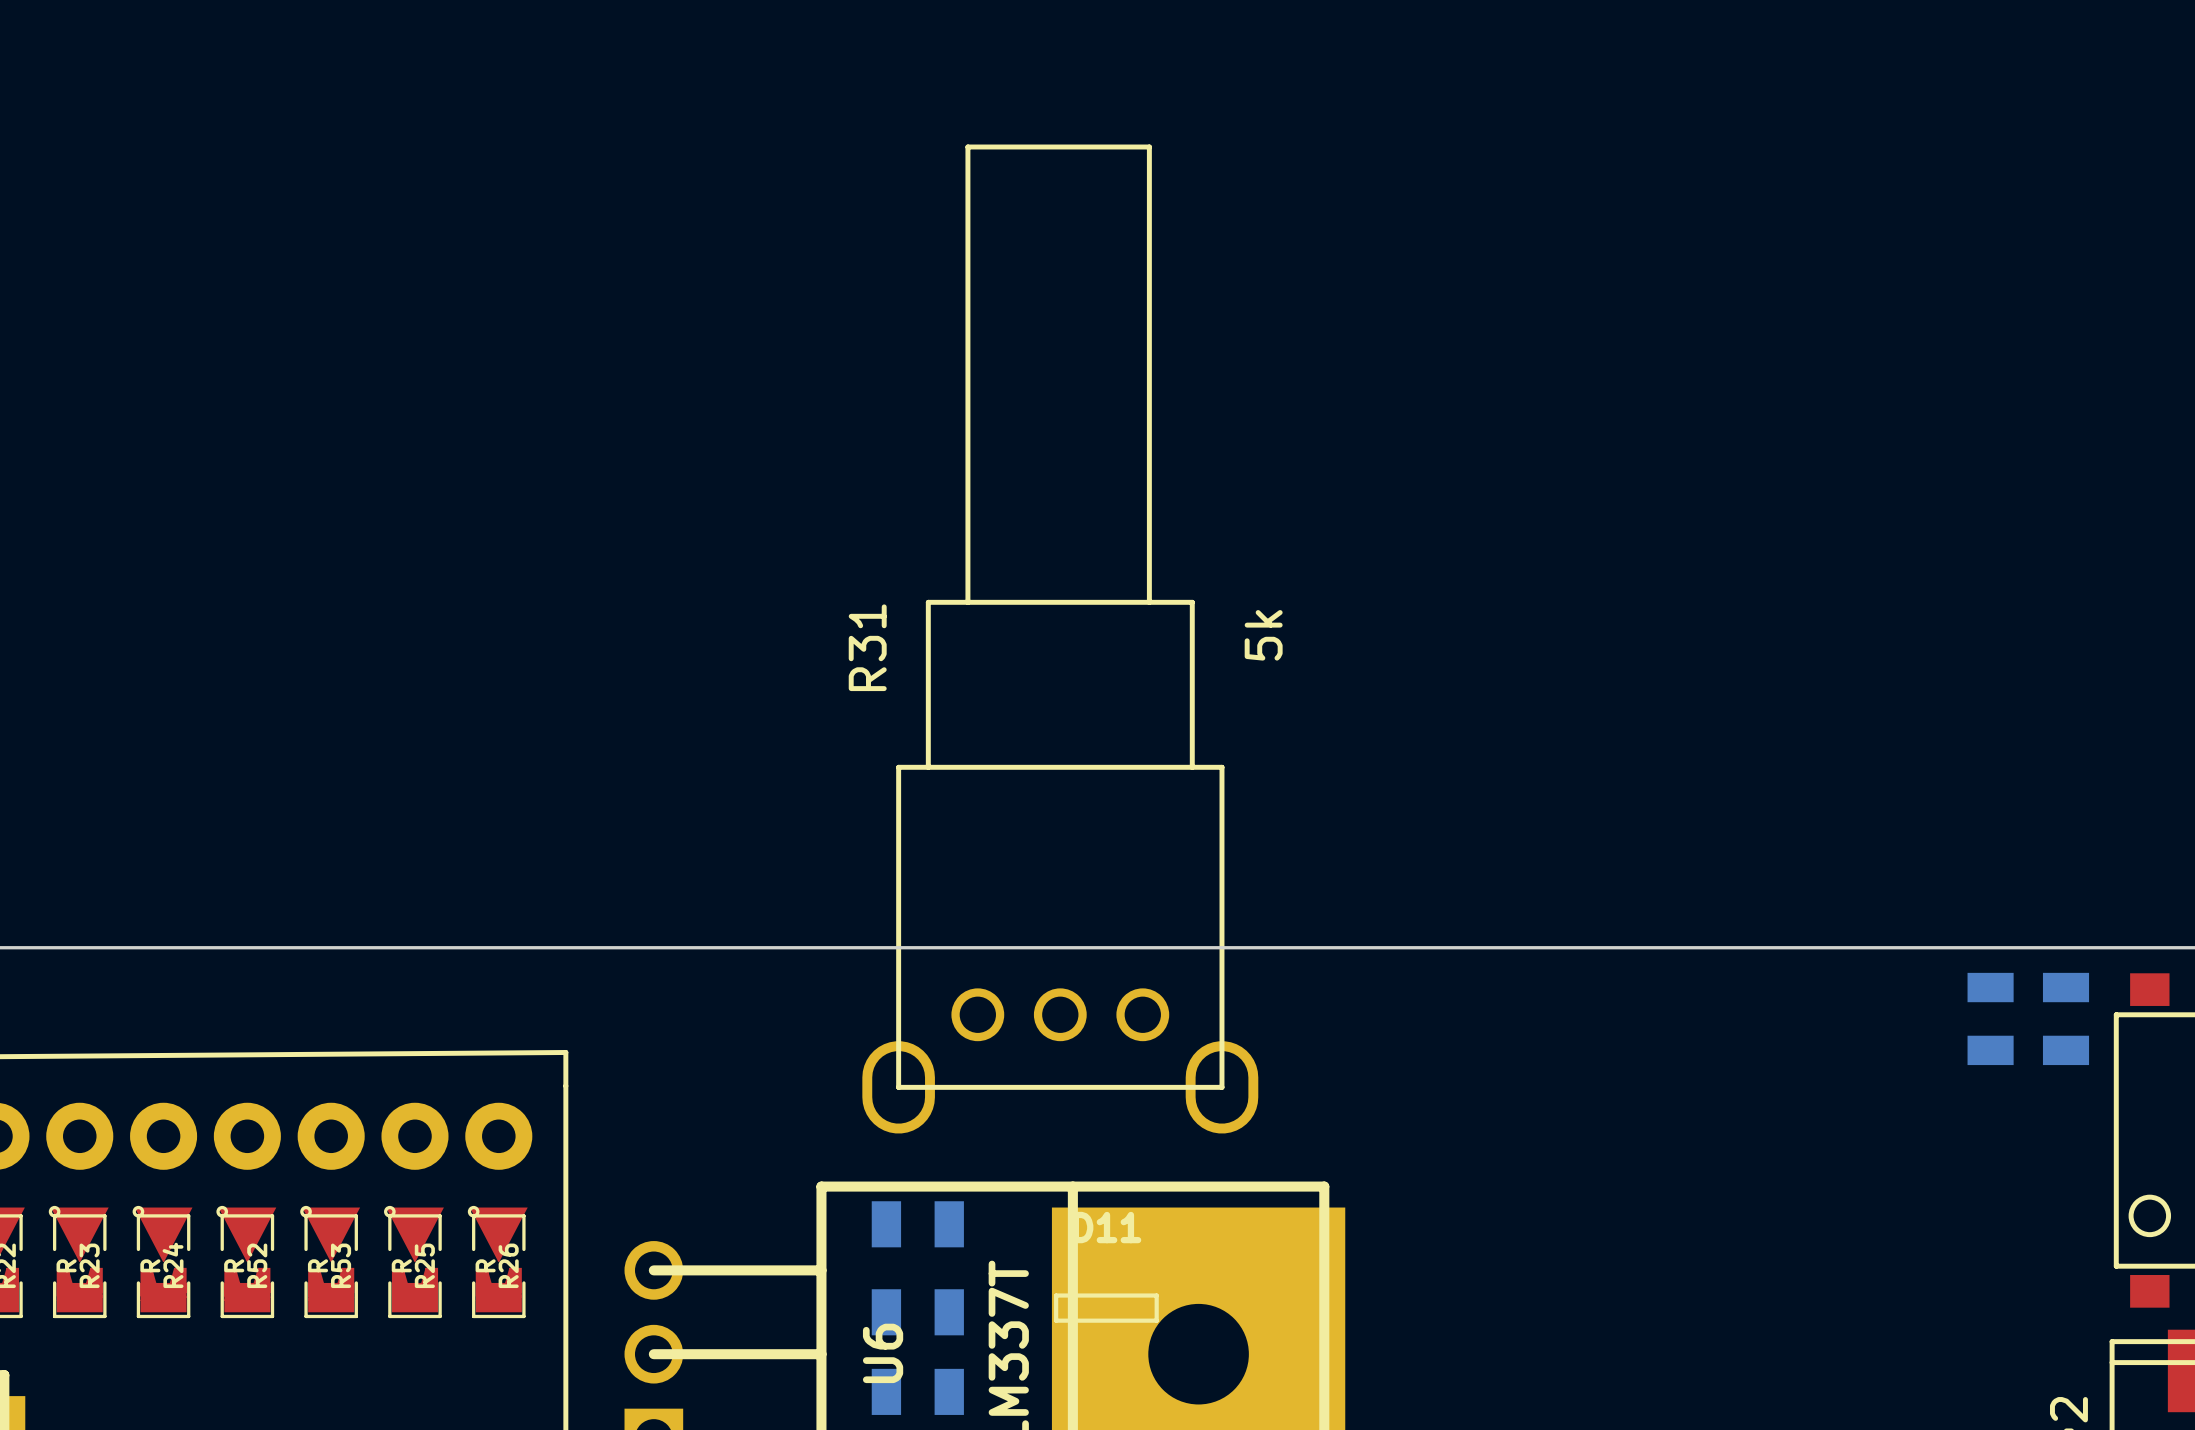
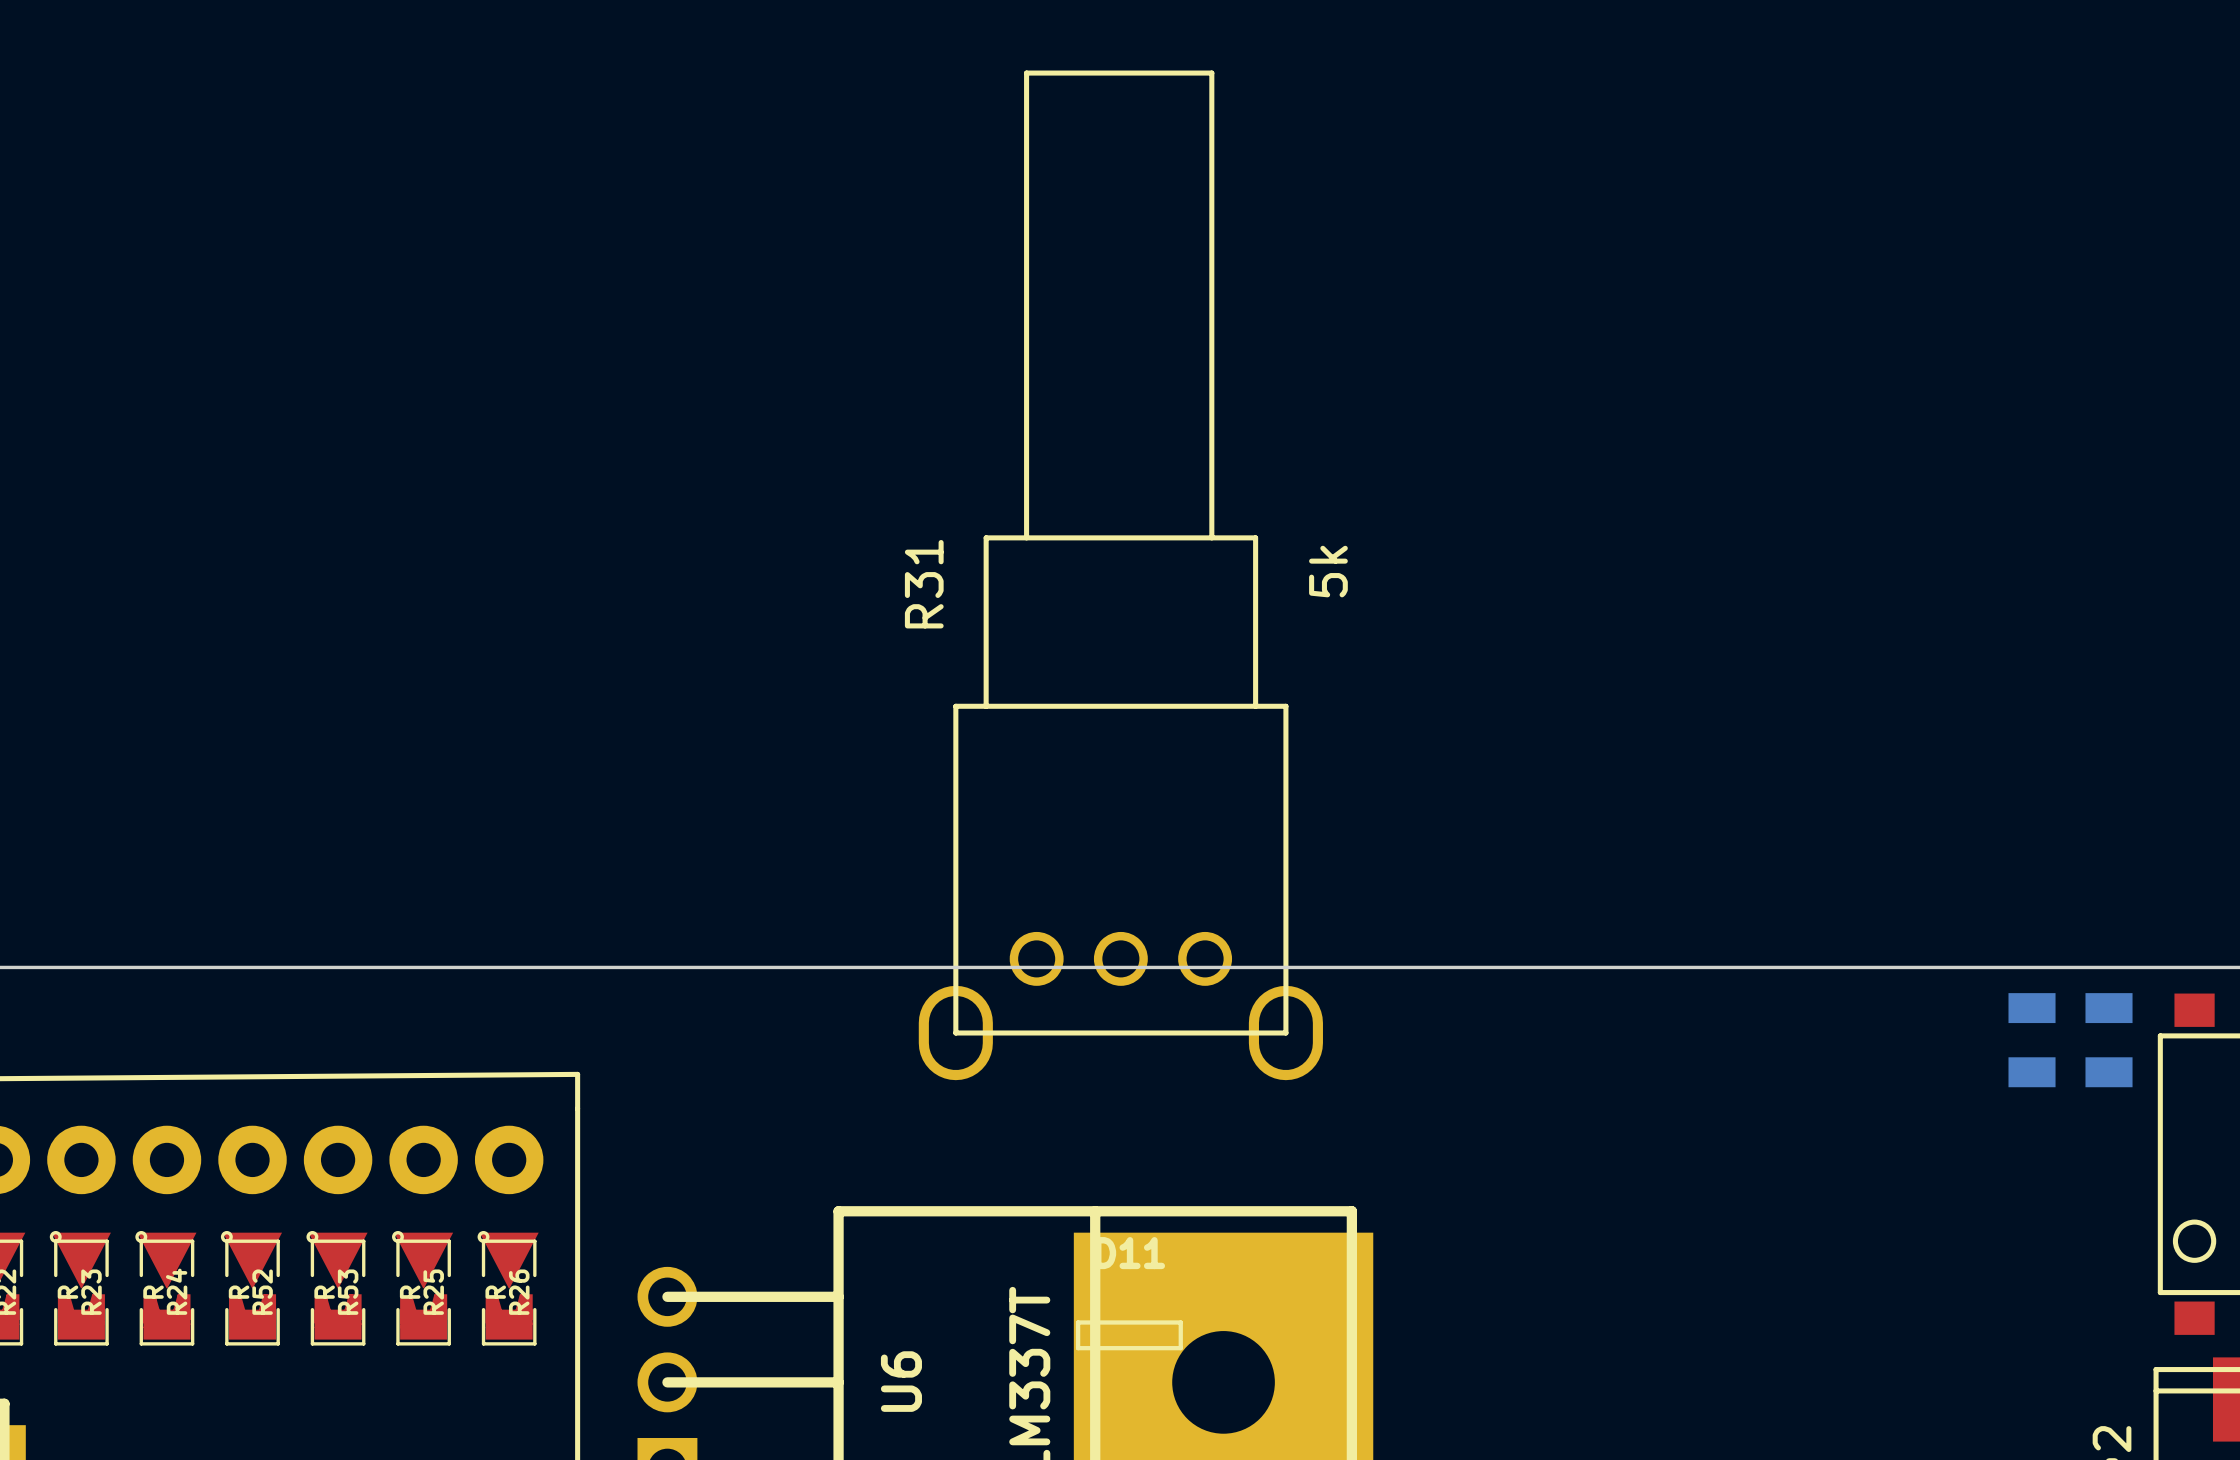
R31 position: (1060, 639) -> (1120, 575)
part: (917, 1224) -> none
part: (917, 1312) -> none
part: (917, 1391) -> none

